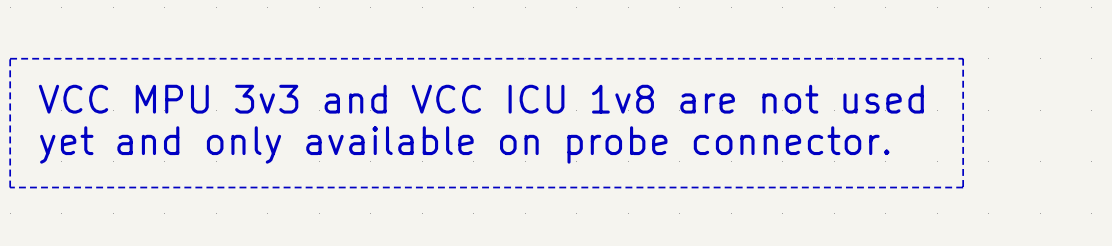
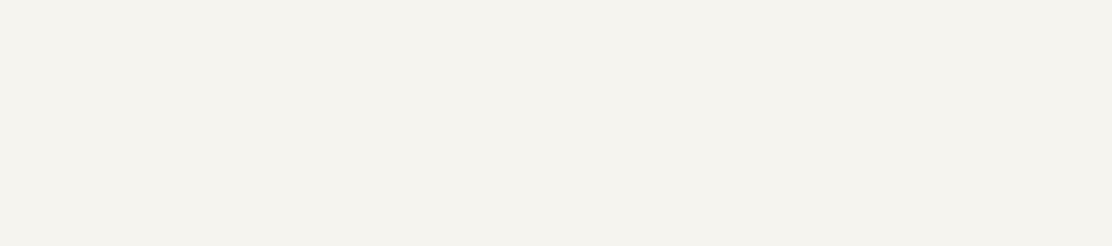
line: (10, 58) (963, 58) (963, 187) (10, 187) (10, 58) -> none
text: VCC MPU 3v3 and VCC ICU 1v8 are not used (481, 99) -> none
text: yet and only available on probe connector. (464, 144) -> none

